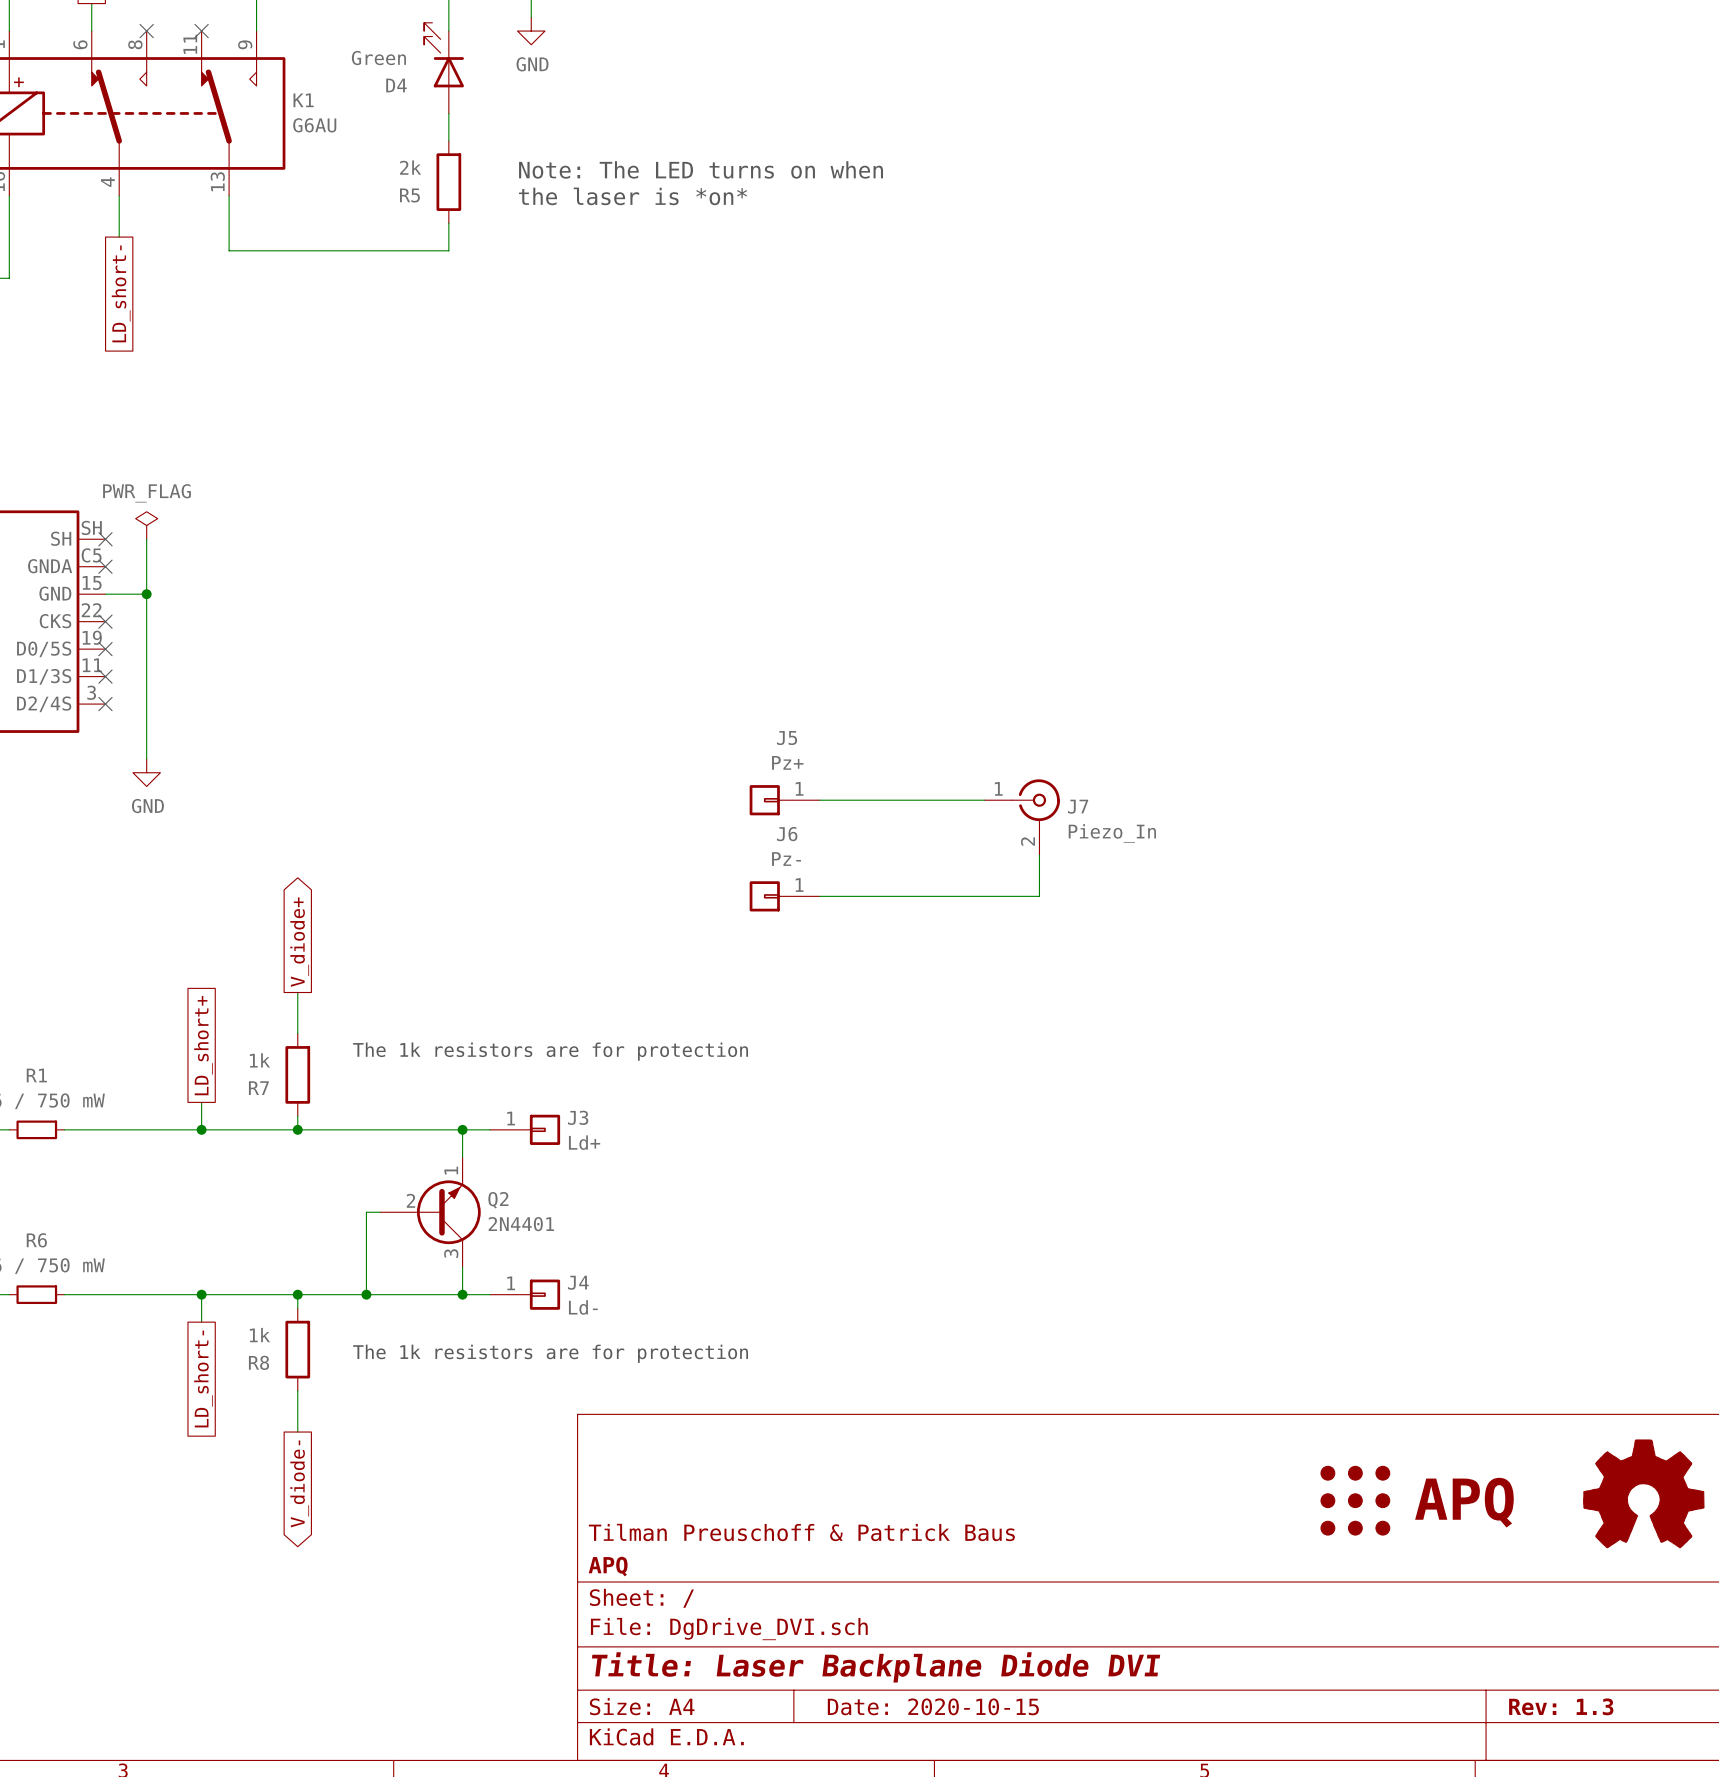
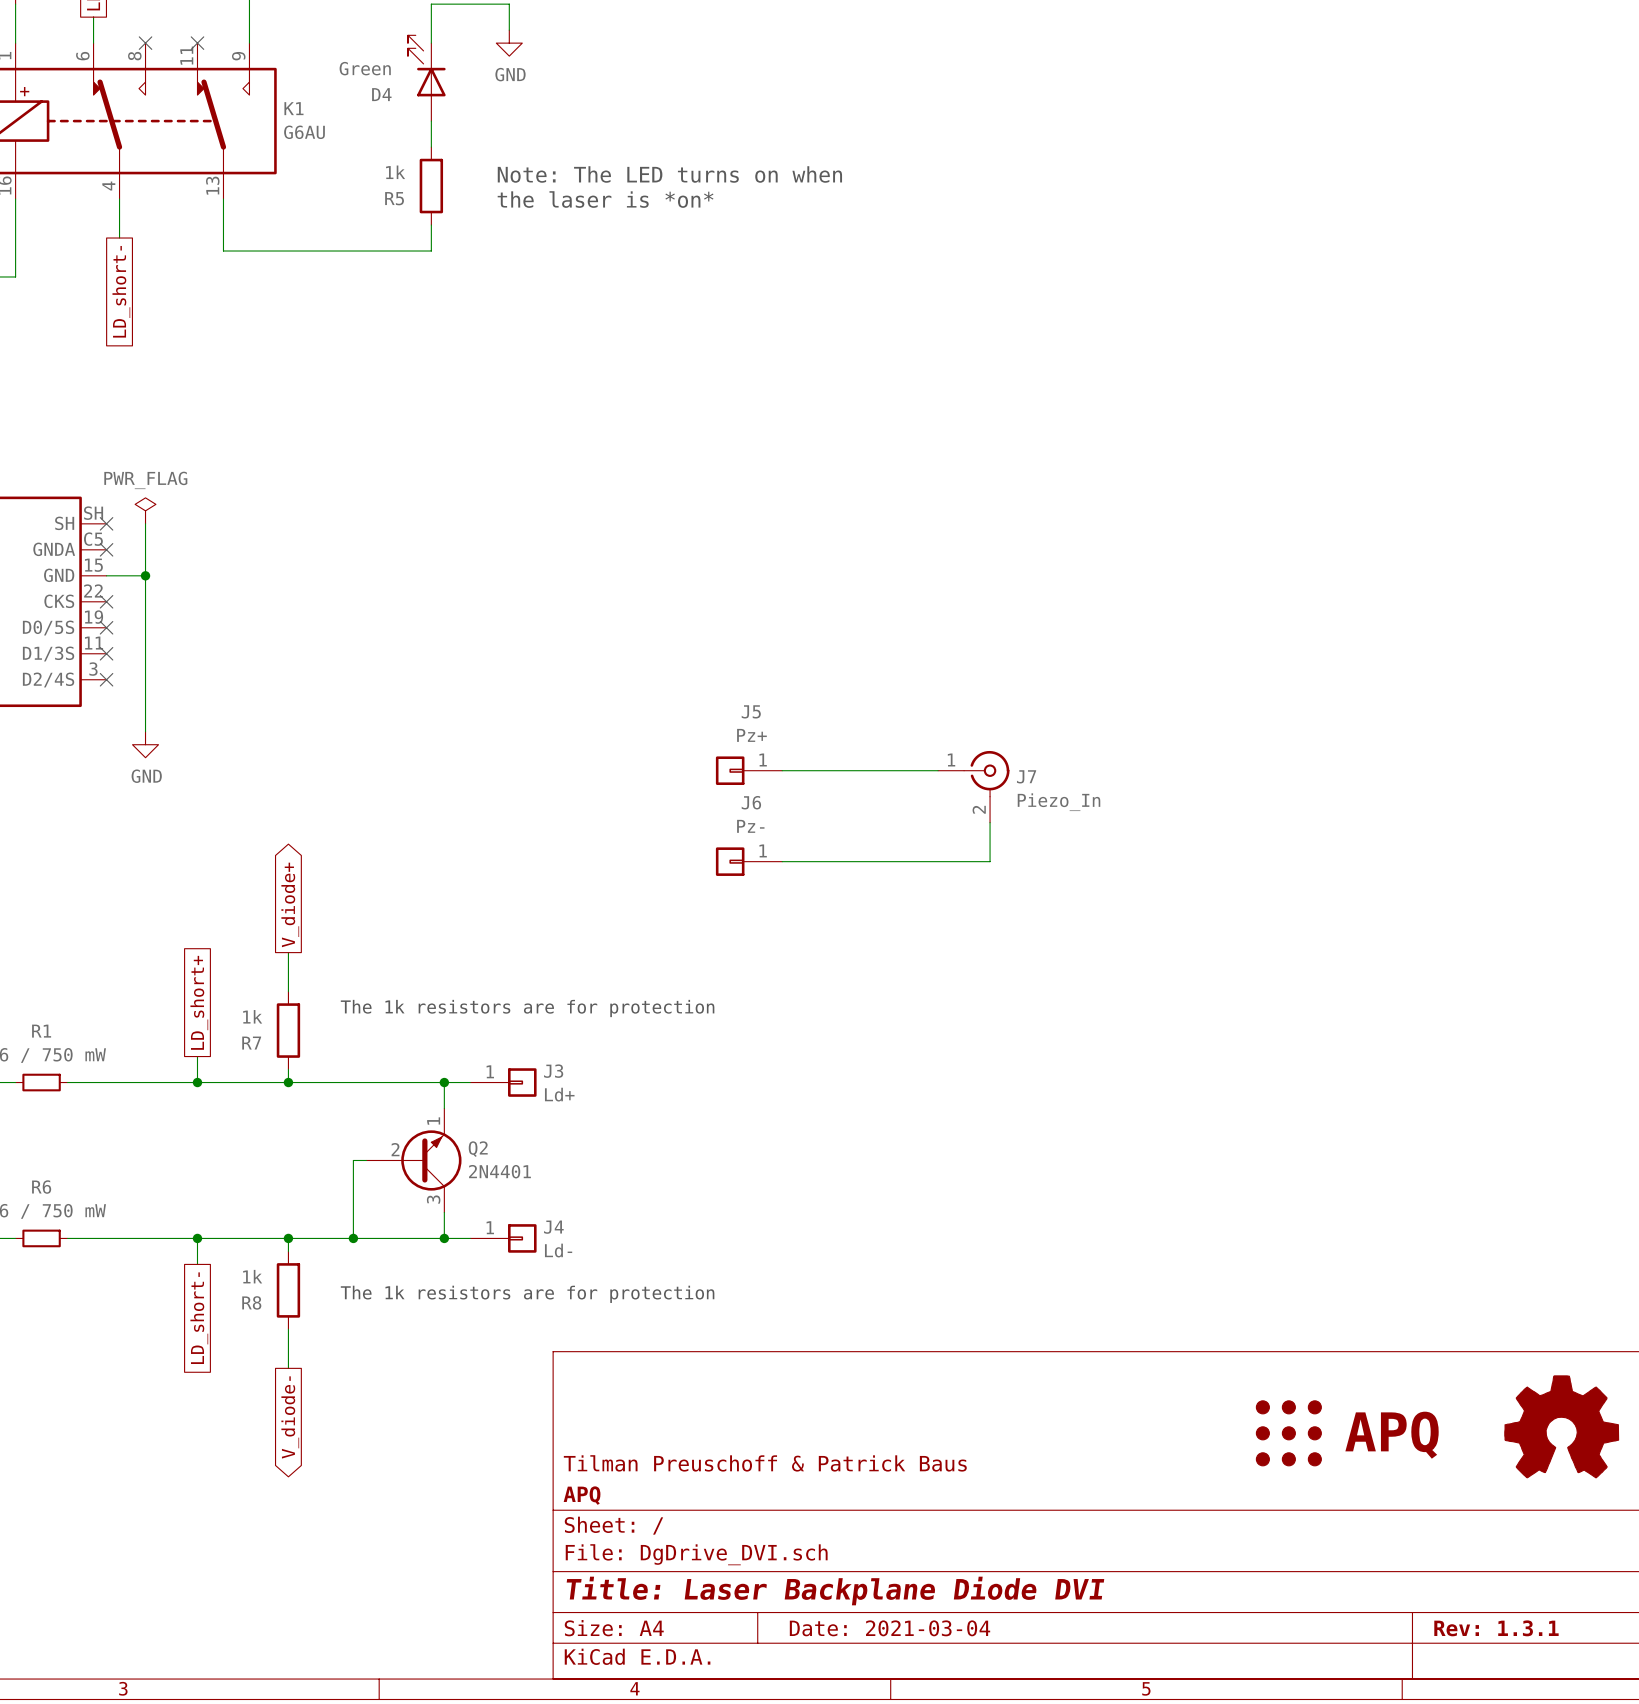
R5 value: 2k (410, 167) -> 1k (395, 172)
title block: Date: 2020-10-15 (933, 1706) -> Date: 2021-03-04 (890, 1628)
title block: Rev: 1.3 (1561, 1706) -> Rev: 1.3.1 (1496, 1628)

